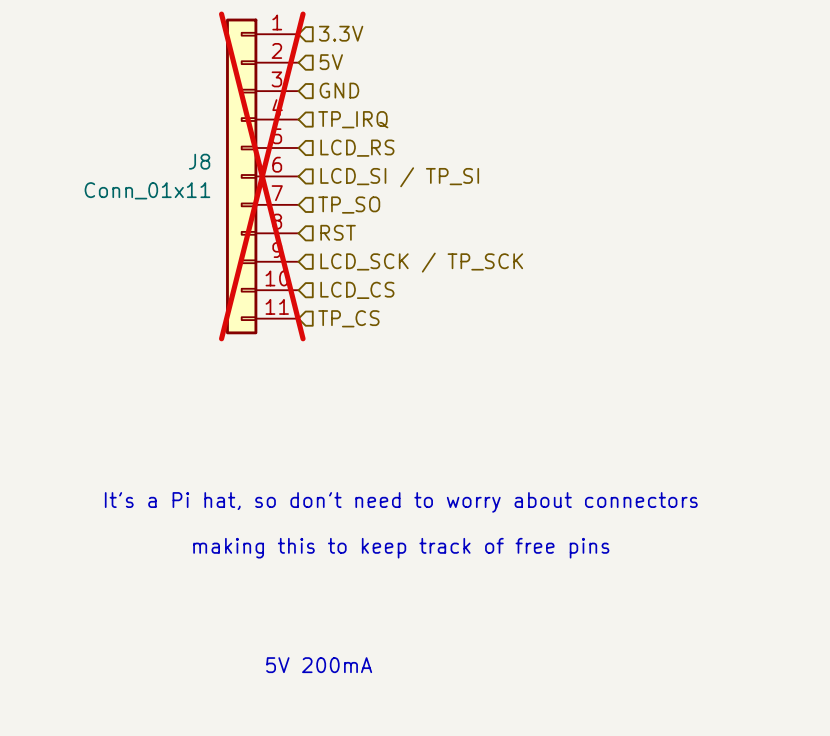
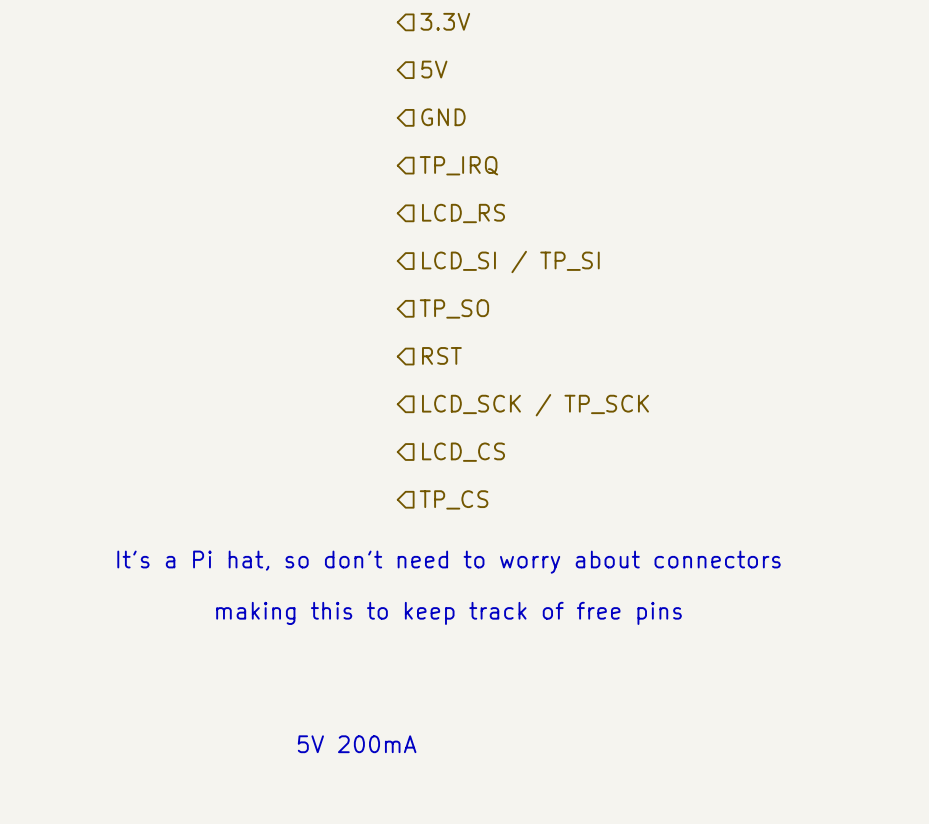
hierarchical label position: 3.3V (341, 33) -> 3.3V (445, 21)
hierarchical label position: 5V (331, 62) -> 5V (434, 69)
hierarchical label position: GND (339, 90) -> GND (443, 117)
hierarchical label position: TP_IRQ (353, 119) -> TP_IRQ (458, 165)
hierarchical label position: LCD_RS (357, 148) -> LCD_RS (463, 213)
J8: Conn_01x11 (262, 176) -> none
hierarchical label position: LCD_SI / TP_SI (399, 177) -> LCD_SI / TP_SI (510, 261)
hierarchical label position: TP_SO (349, 205) -> TP_SO (454, 308)
hierarchical label position: RST (338, 232) -> RST (441, 355)
hierarchical label position: LCD_SCK / TP_SCK (421, 262) -> LCD_SCK / TP_SCK (535, 405)
hierarchical label position: LCD_CS (357, 290) -> LCD_CS (463, 452)
hierarchical label position: TP_CS (348, 318) -> TP_CS (454, 499)

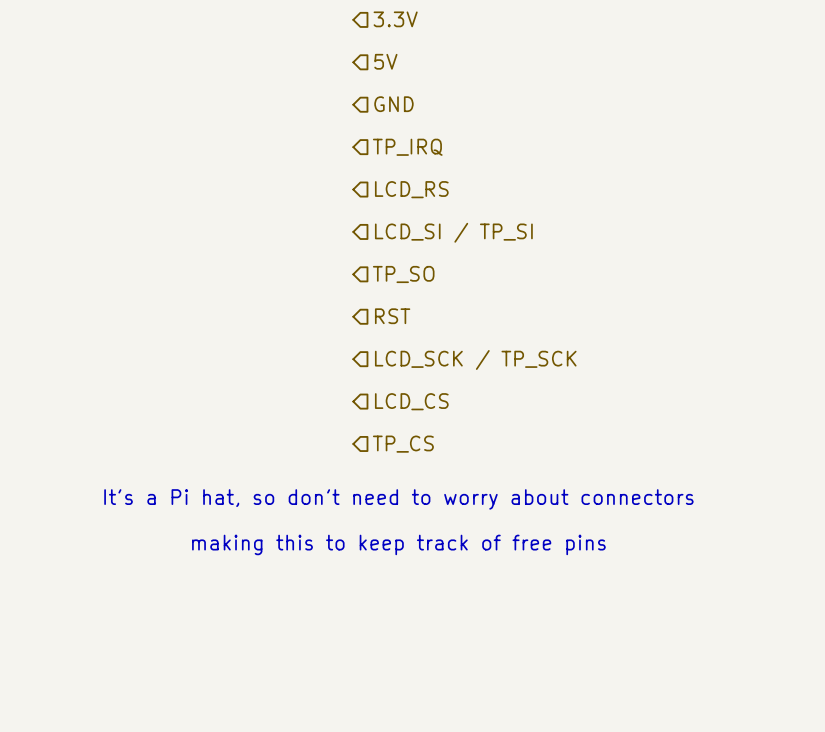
text: 5V 200mA (357, 744) -> none

